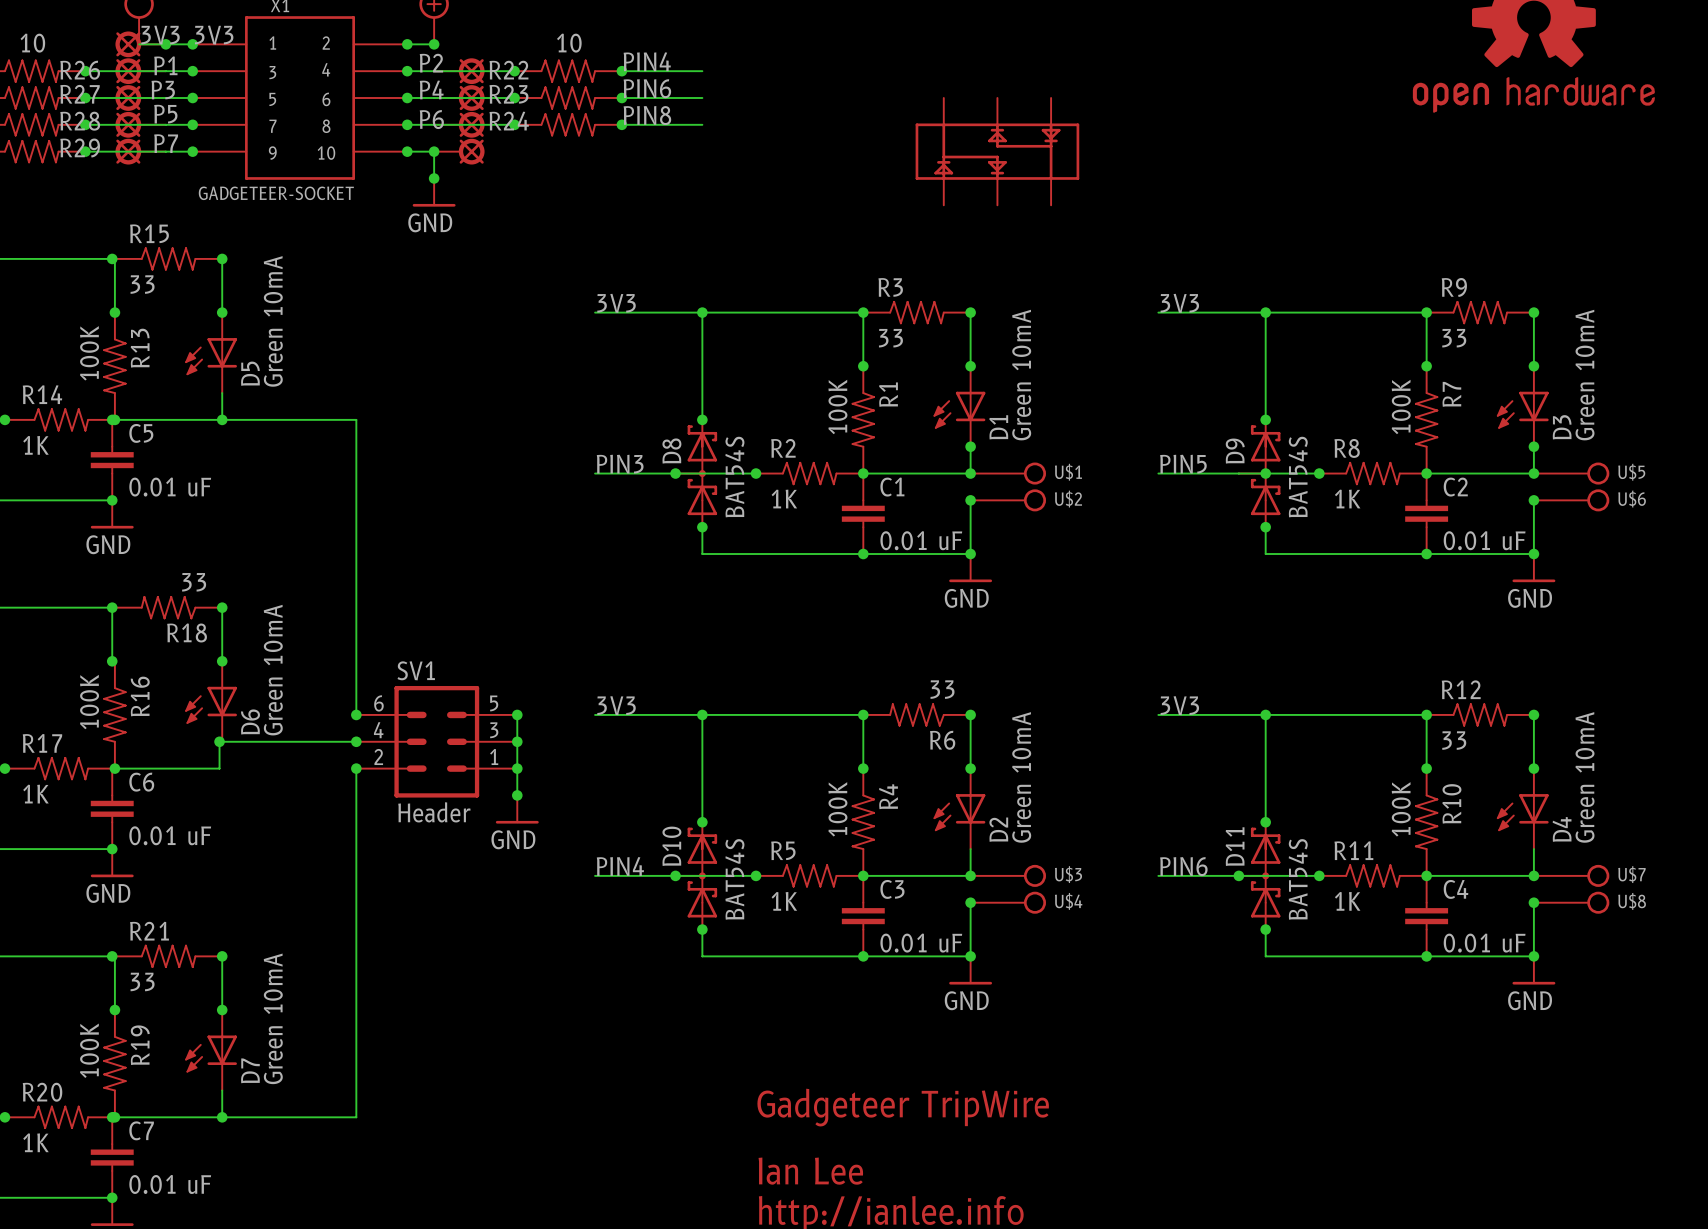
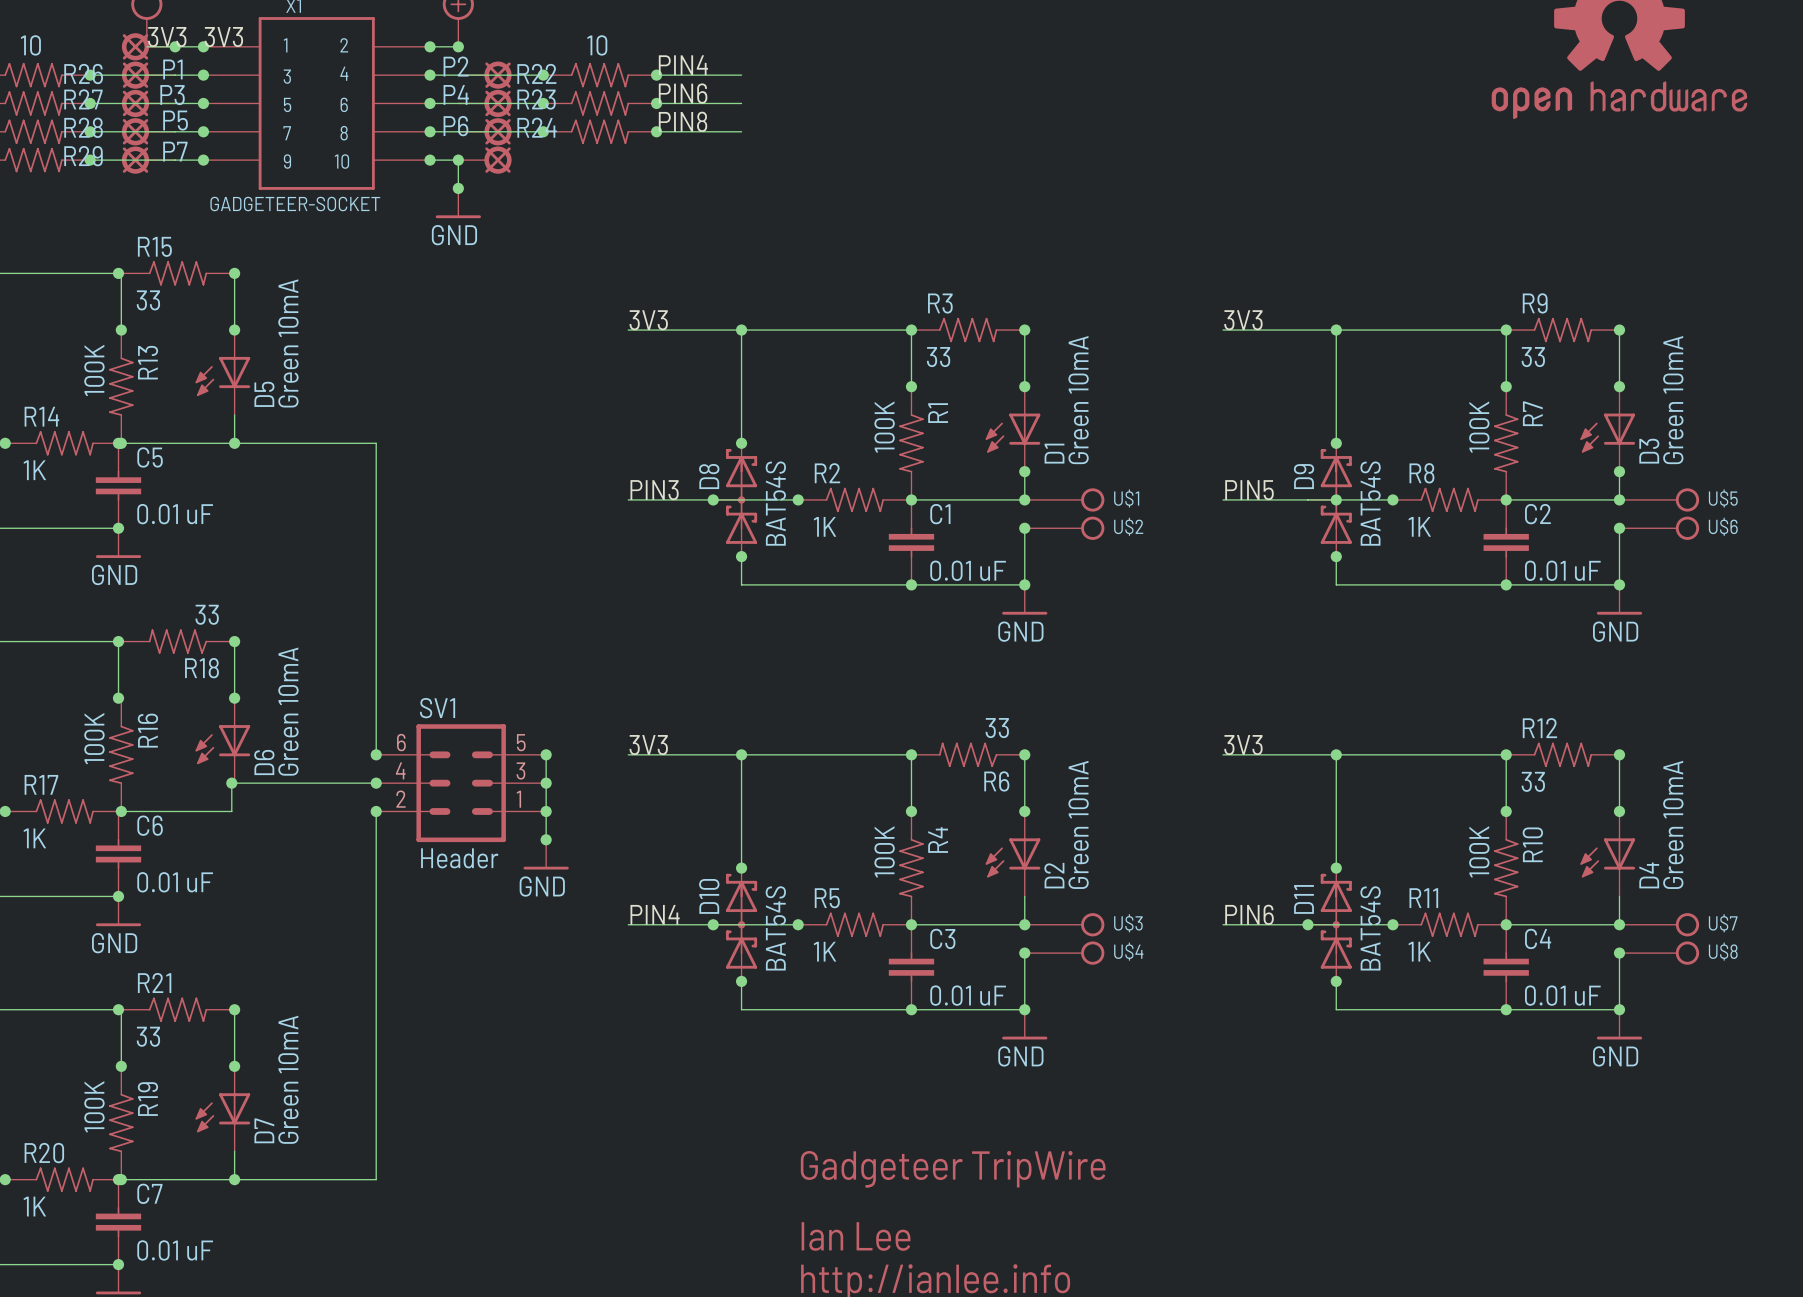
part: (997, 151) -> none

